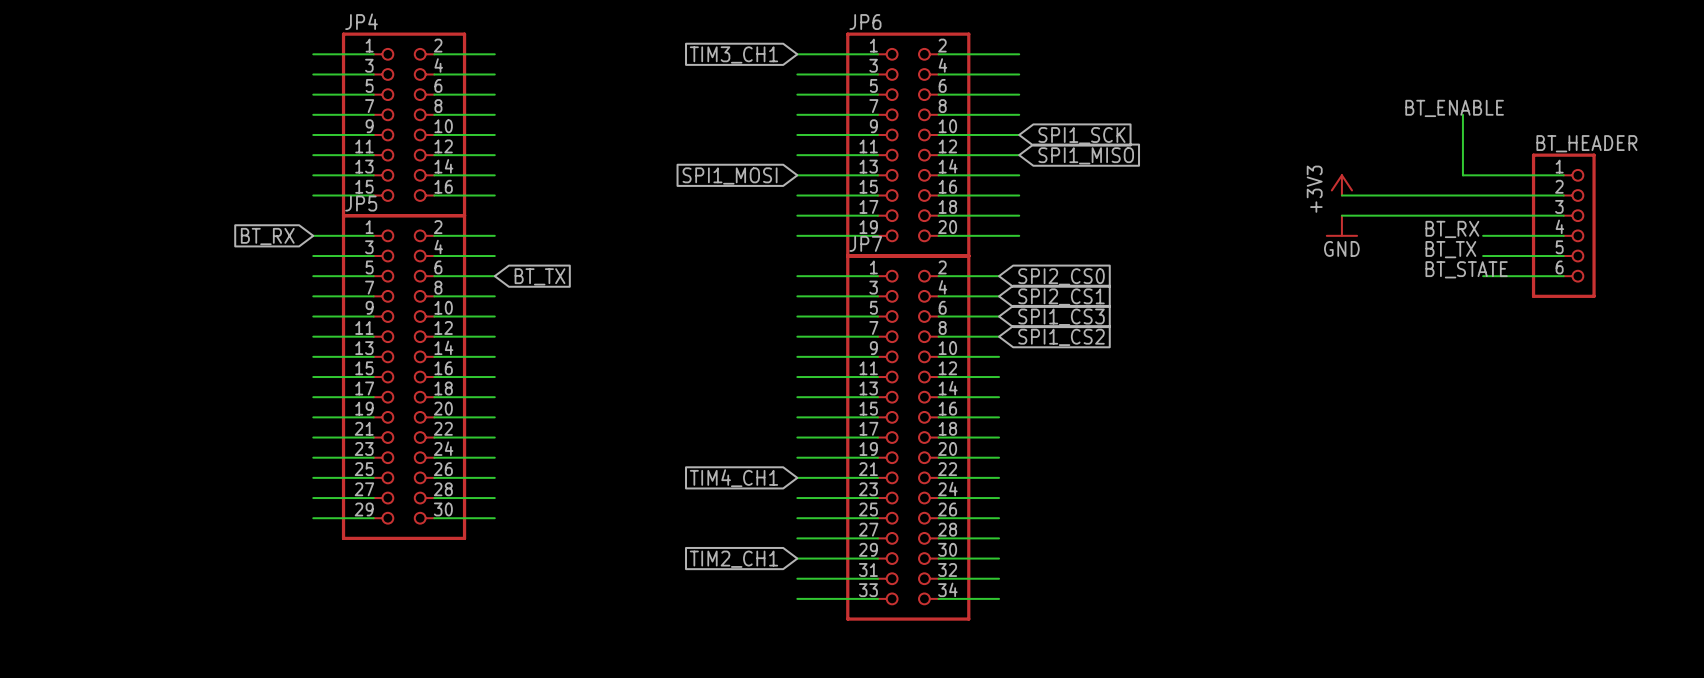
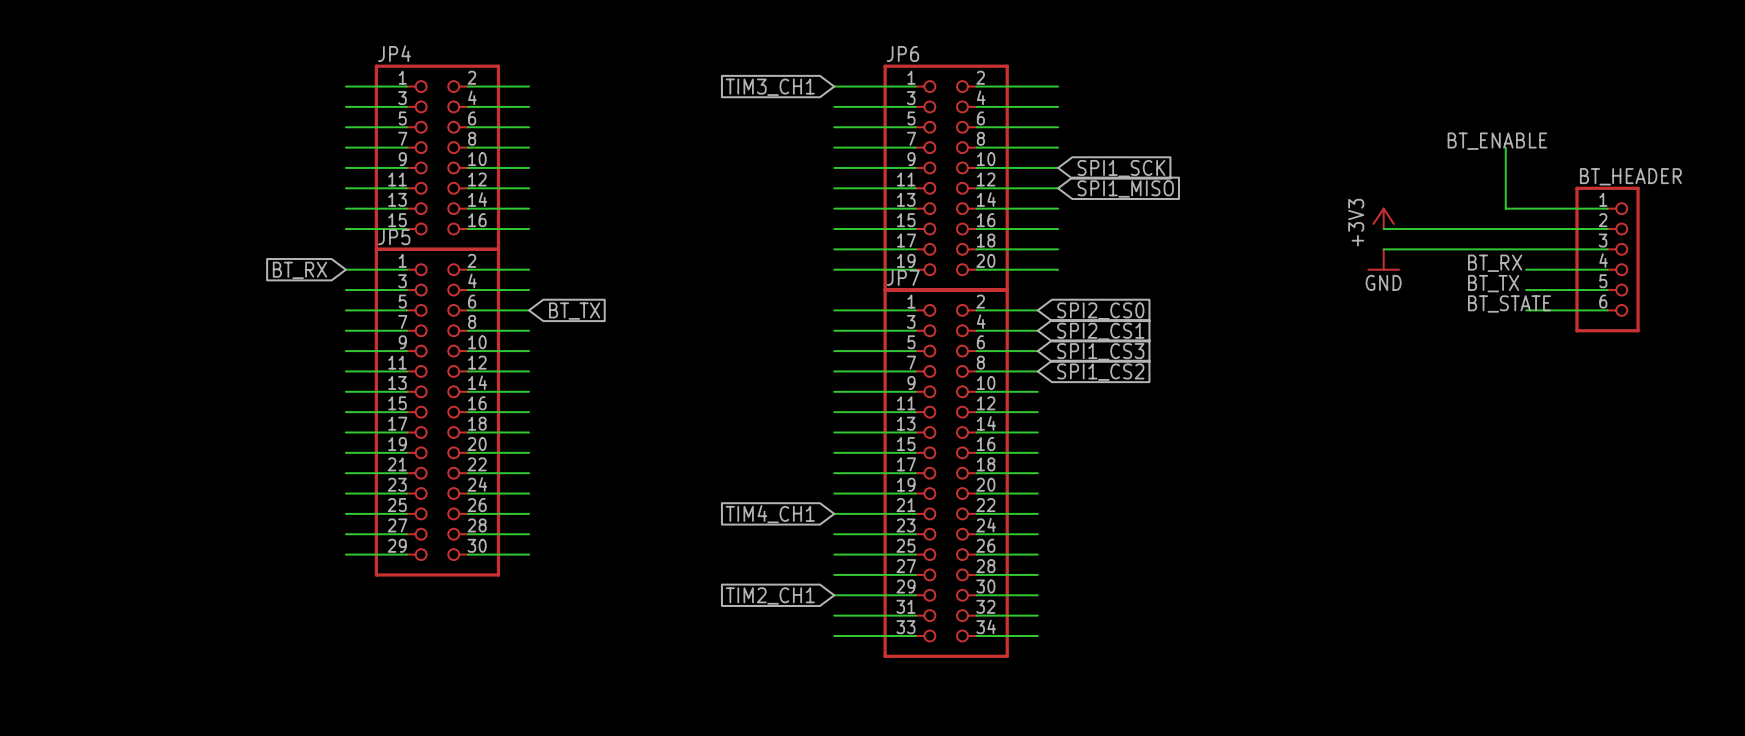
global label: SPI1_MOSI (730, 176) -> none

